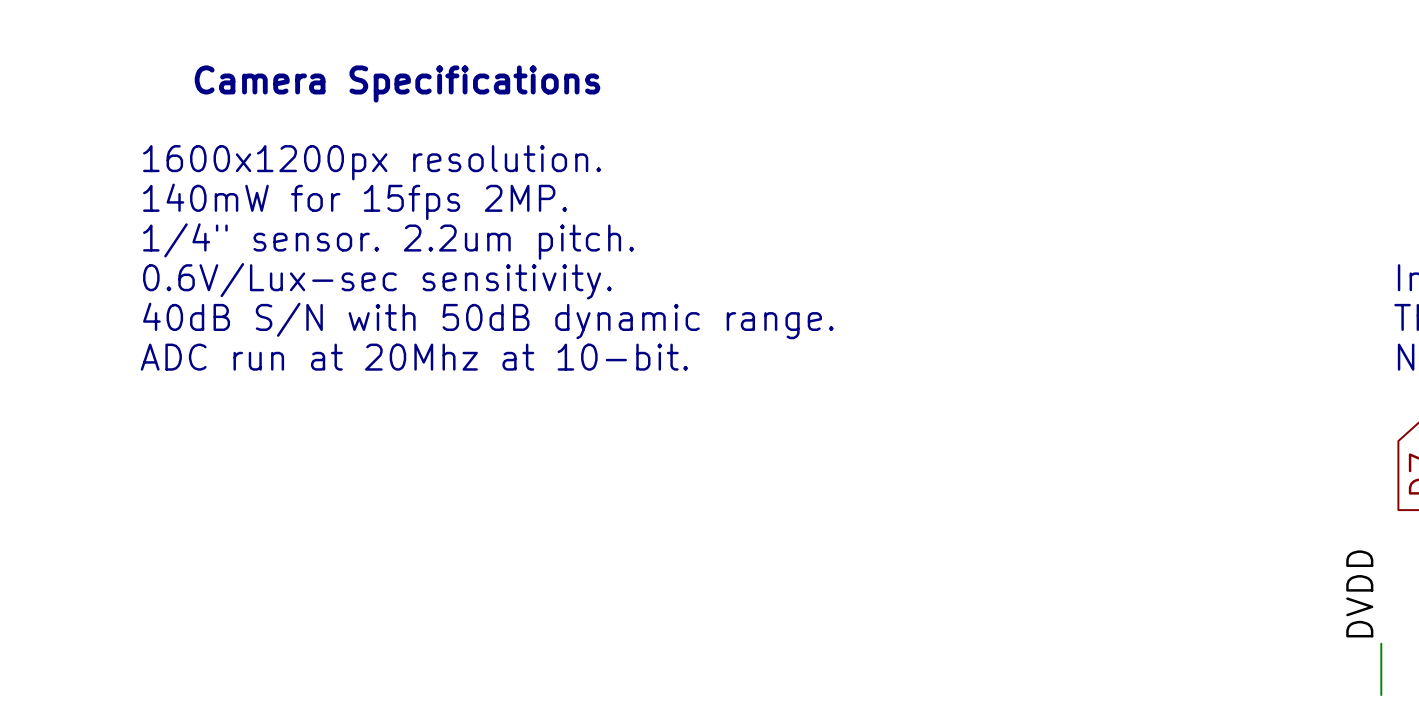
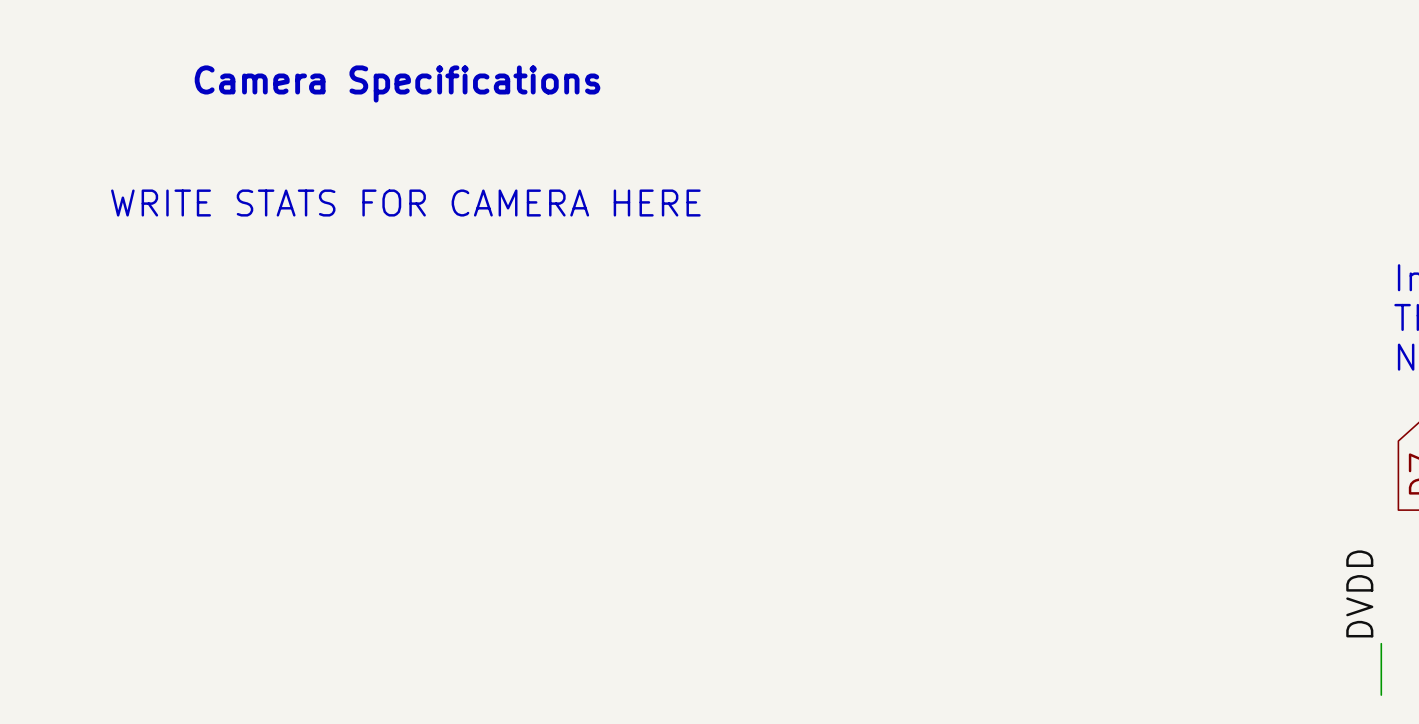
text: 1600x1200px resolution. (372, 162) -> none
text: 140mW for 15fps 2MP. (355, 201) -> none
text: none -> WRITE STATS FOR CAMERA HERE (405, 203)
text: 1/4" sensor. 2.2um pitch. (388, 241) -> none
text: 0.6V/Lux-sec sensitivity. (377, 281) -> none
text: 40dB S/N with 50dB dynamic range. (488, 320) -> none
text: ADC run at 20Mhz at 10-bit. (414, 357) -> none

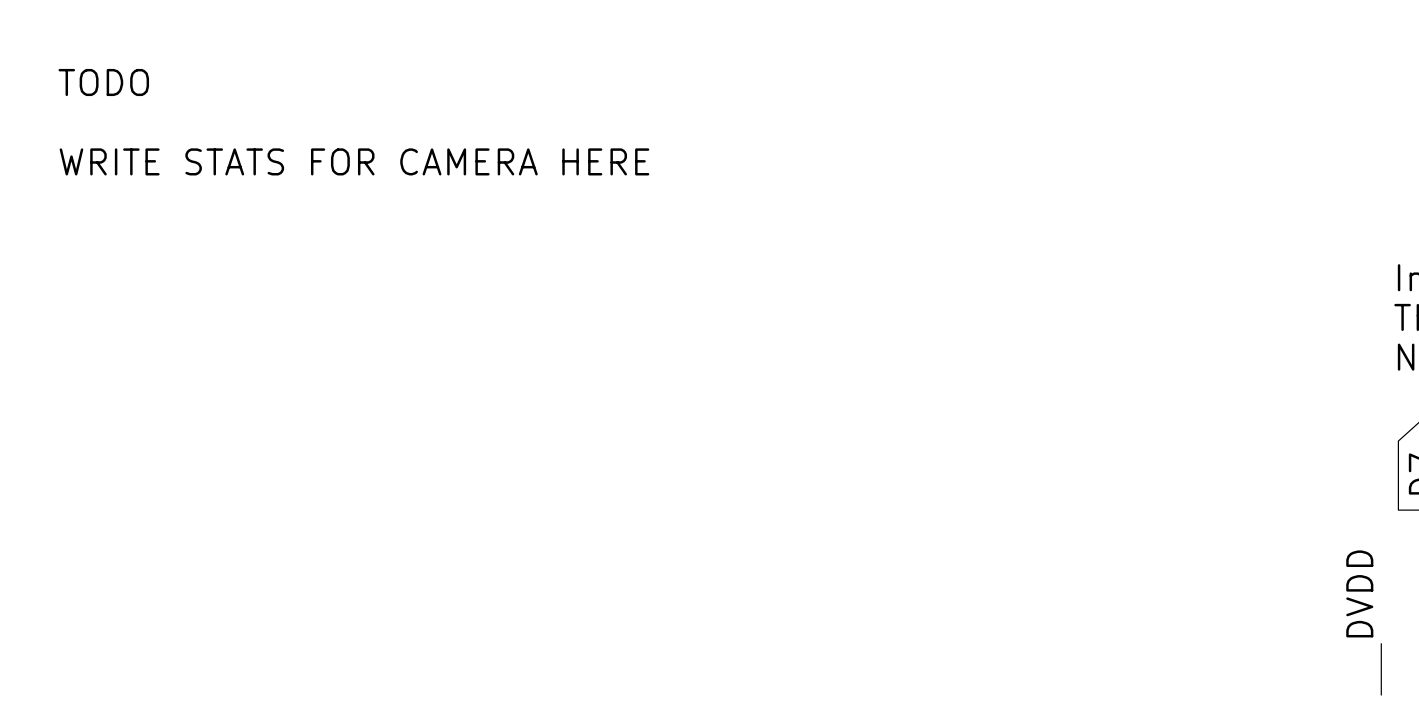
text: none -> TODO (103, 82)
text: Camera Specifications (397, 84) -> none
text position: WRITE STATS FOR CAMERA HERE (405, 203) -> WRITE STATS FOR CAMERA HERE (354, 161)

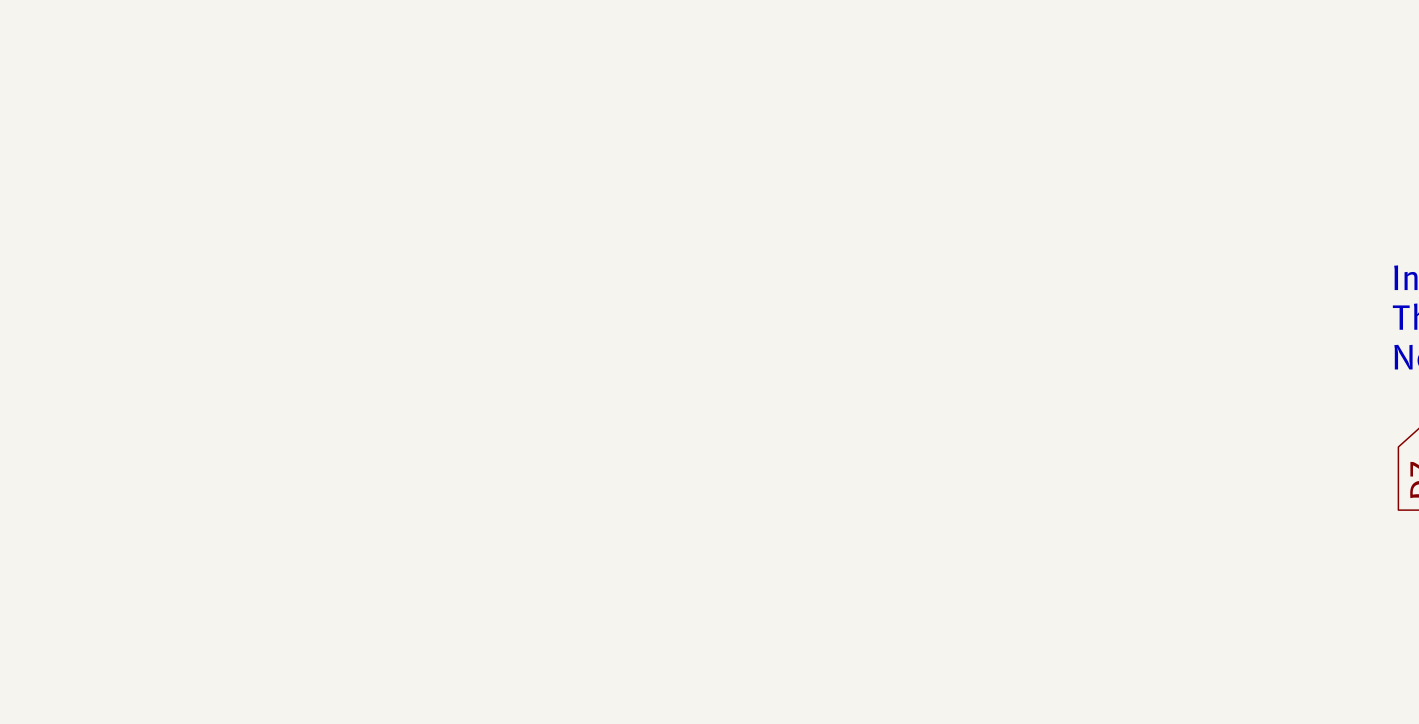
text: TODO (103, 82) -> none
text: WRITE STATS FOR CAMERA HERE (354, 161) -> none
label: DVDD (1359, 593) -> none
wire: (1381, 643) (1381, 695) -> none

